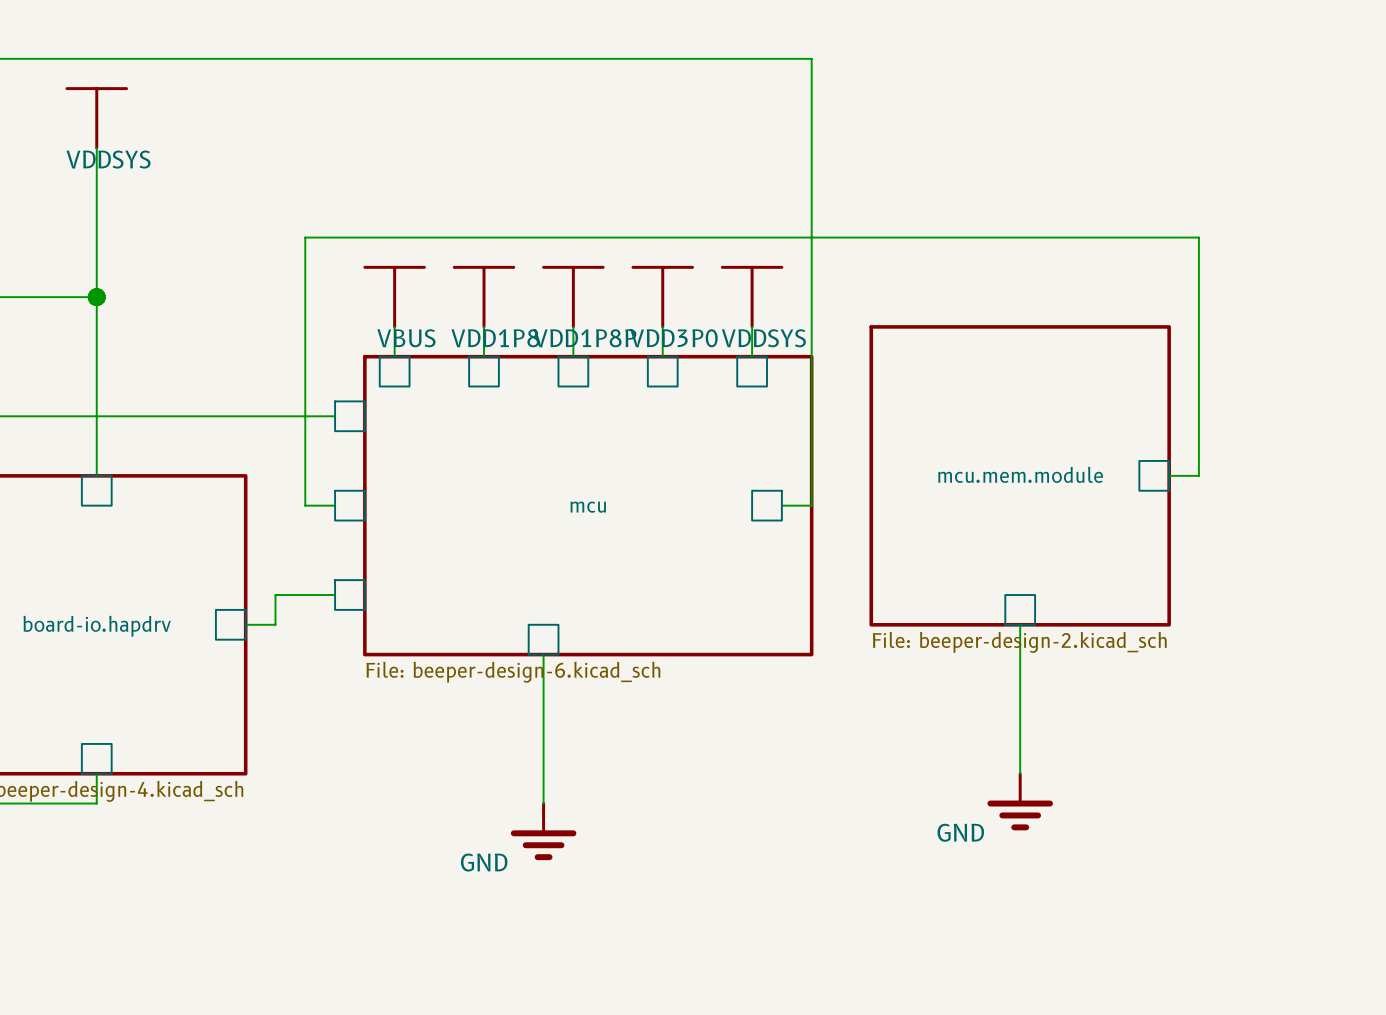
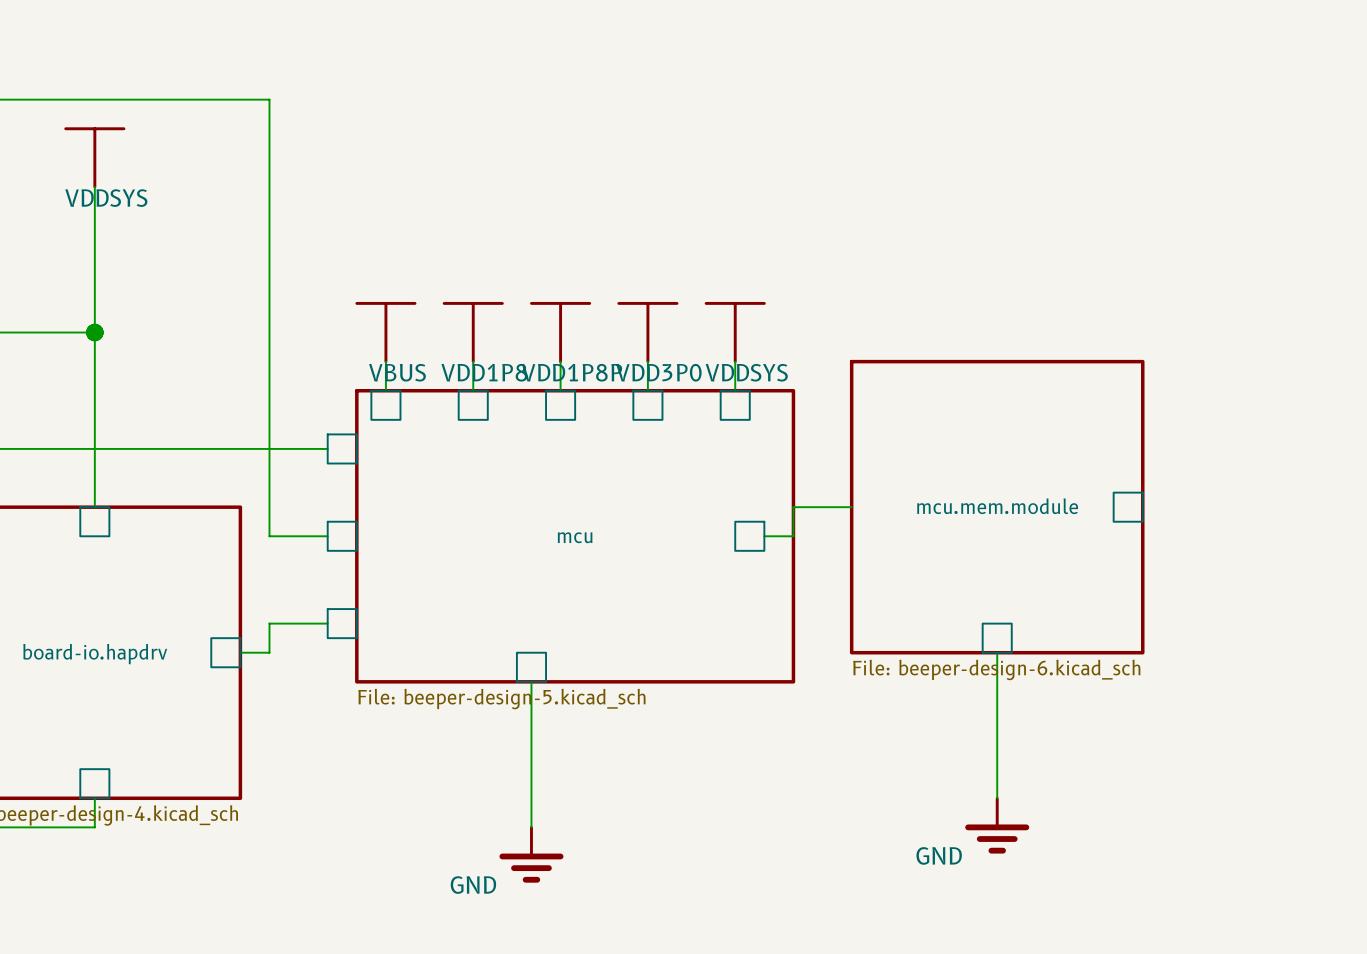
wire: (275, 58) (811, 58) (811, 475) -> (269, 99) (269, 536) (298, 536)
wire: none -> (793, 507) (851, 507)
wire: (1169, 475) (1198, 475) (1198, 237) (305, 237) (305, 505) -> none
sheet mcu.mem.module value: File: beeper-design-2.kicad_sch (1019, 642) -> File: beeper-design-6.kicad_sch (996, 669)
sheet mcu value: File: beeper-design-6.kicad_sch (513, 672) -> File: beeper-design-5.kicad_sch (501, 699)

